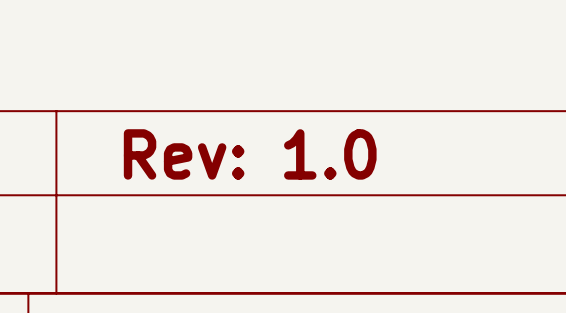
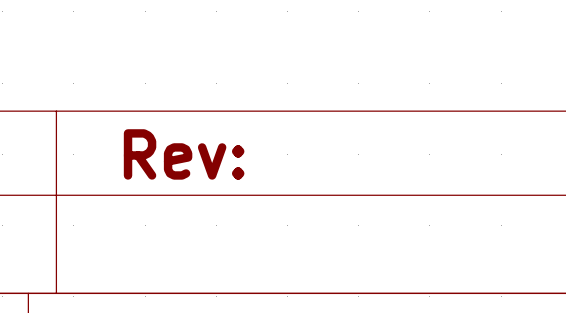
title block: Rev: 1.0 (250, 154) -> Rev: (184, 154)

